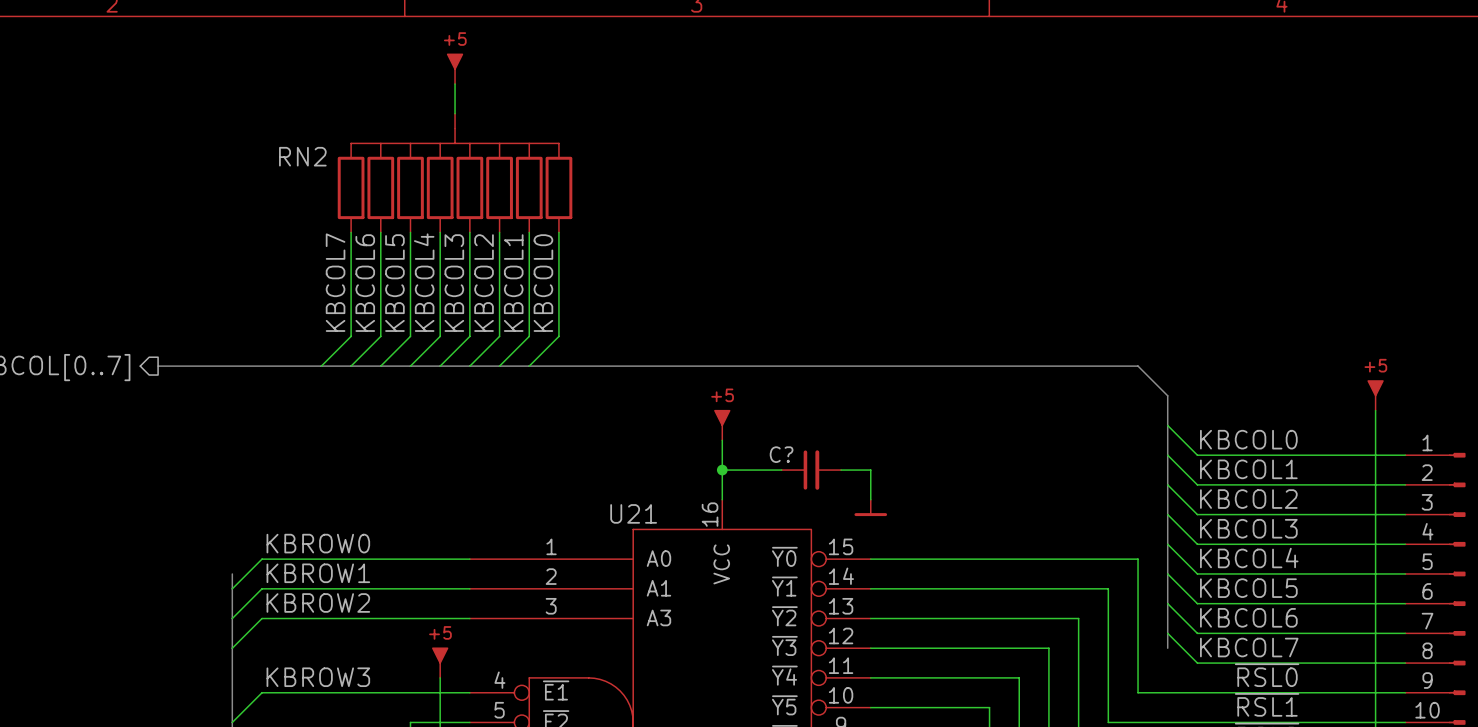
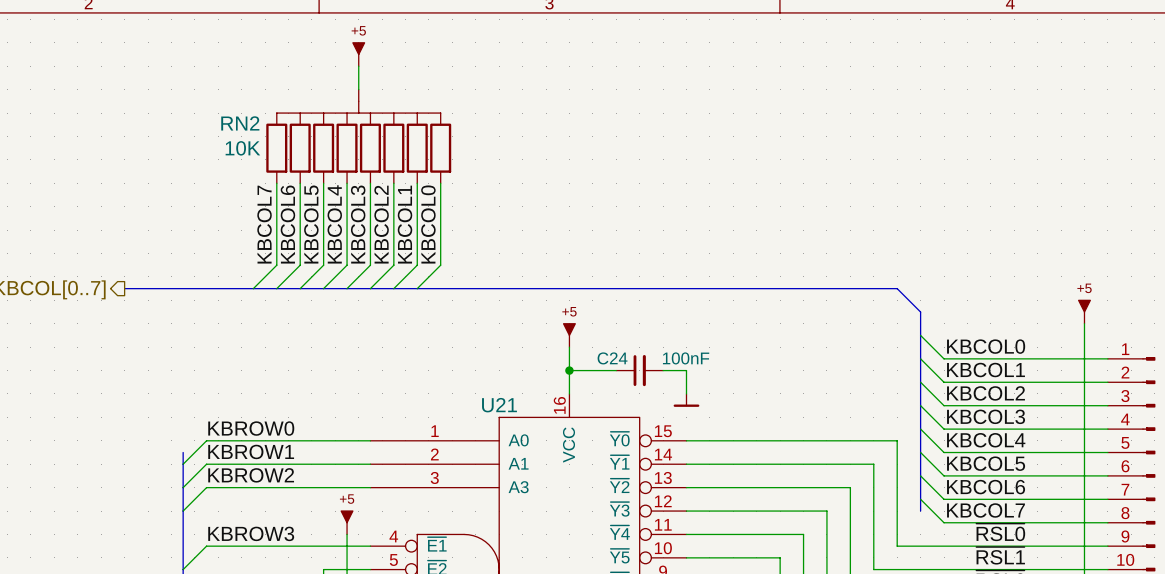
RN2 value: none -> 10K (242, 148)
C? name: C? (781, 454) -> C24 (612, 358)
C? value: none -> 100nF (686, 358)

